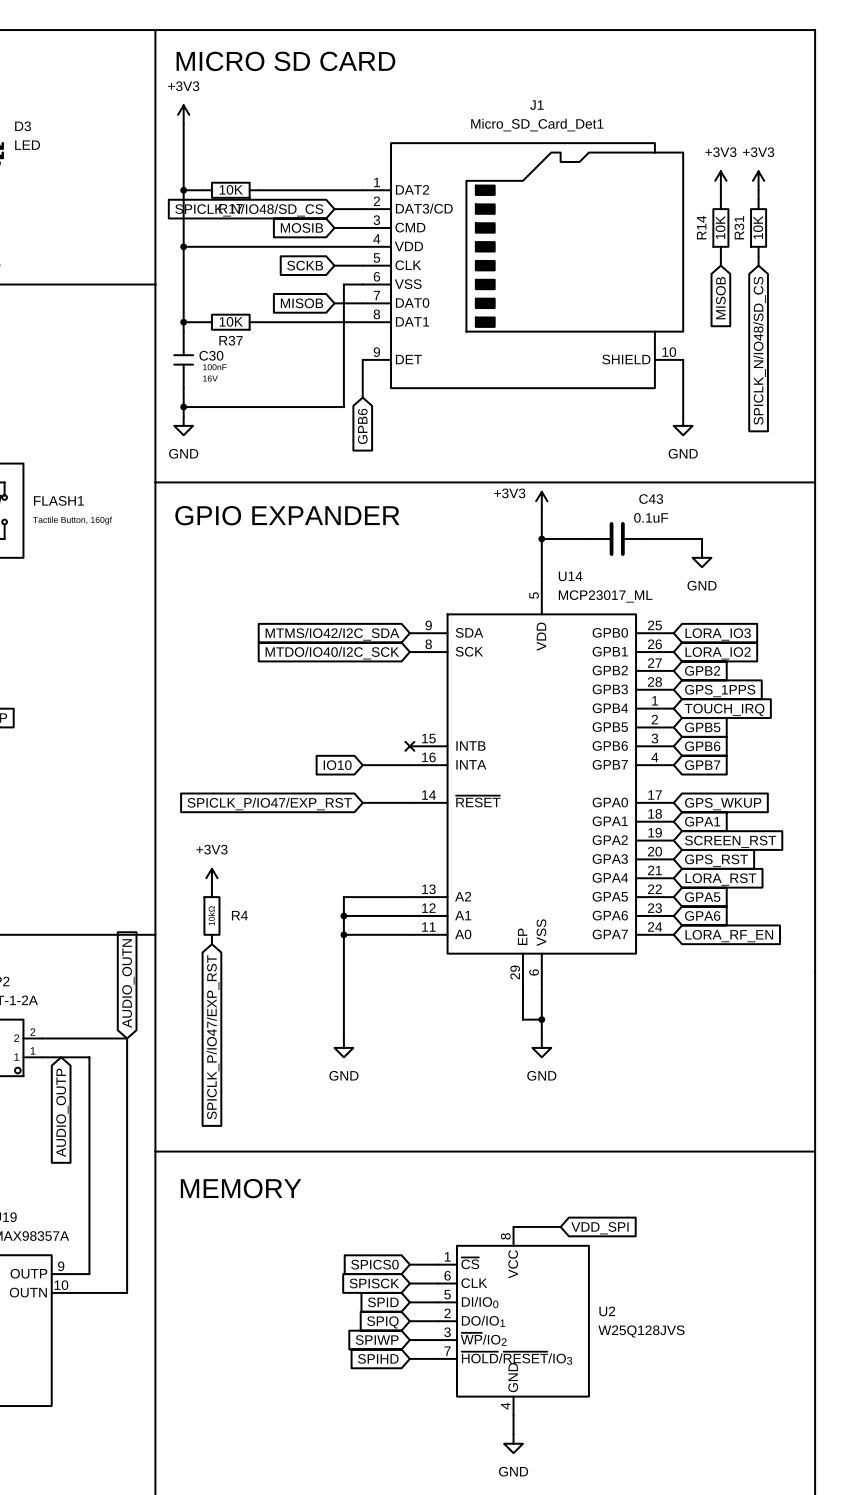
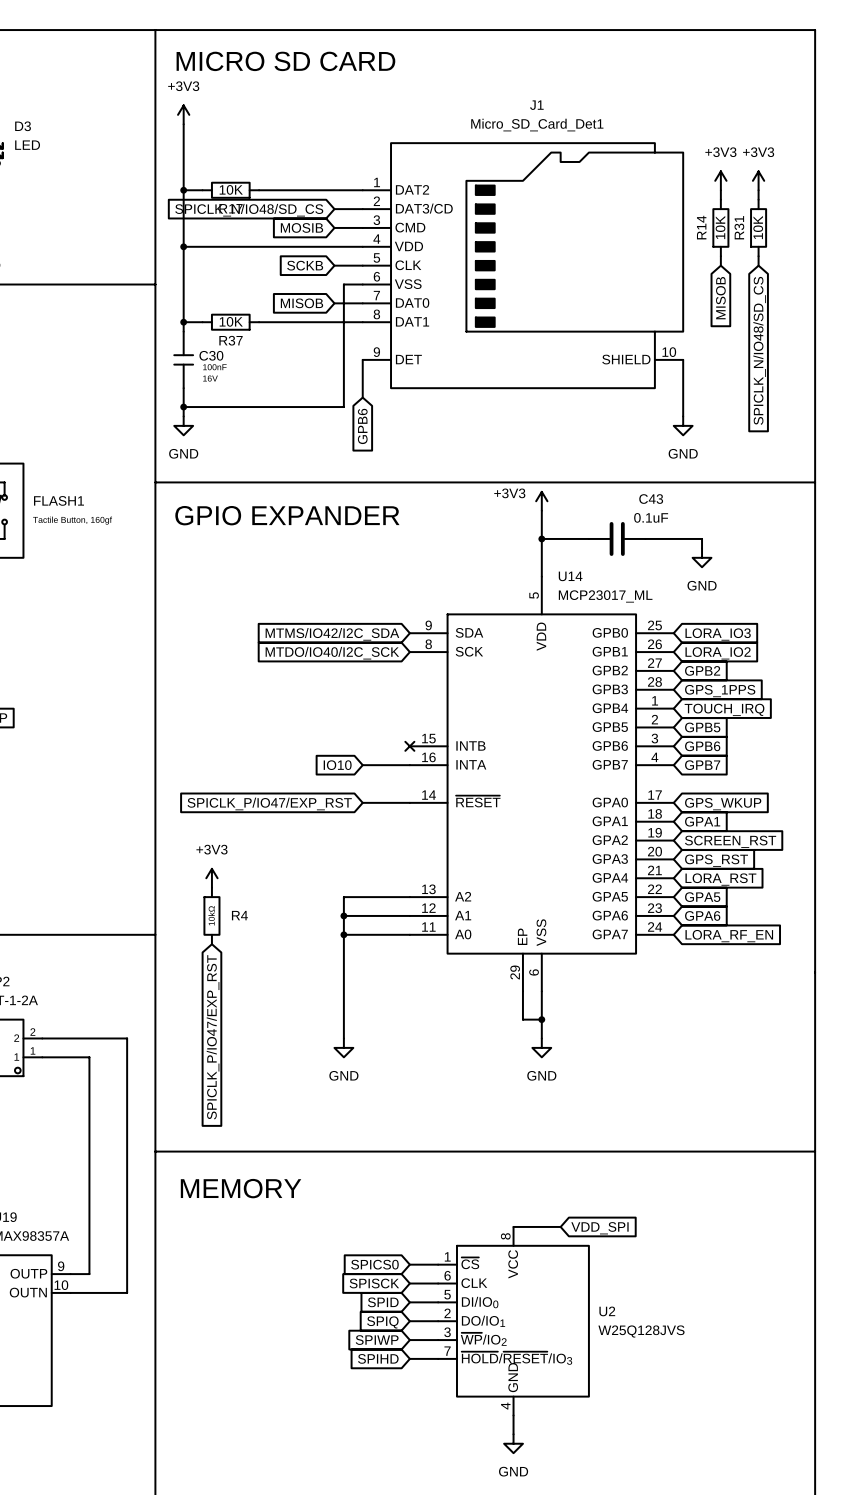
global label: AUDIO_OUTN (128, 983) -> none
global label: AUDIO_OUTP (62, 1112) -> none

